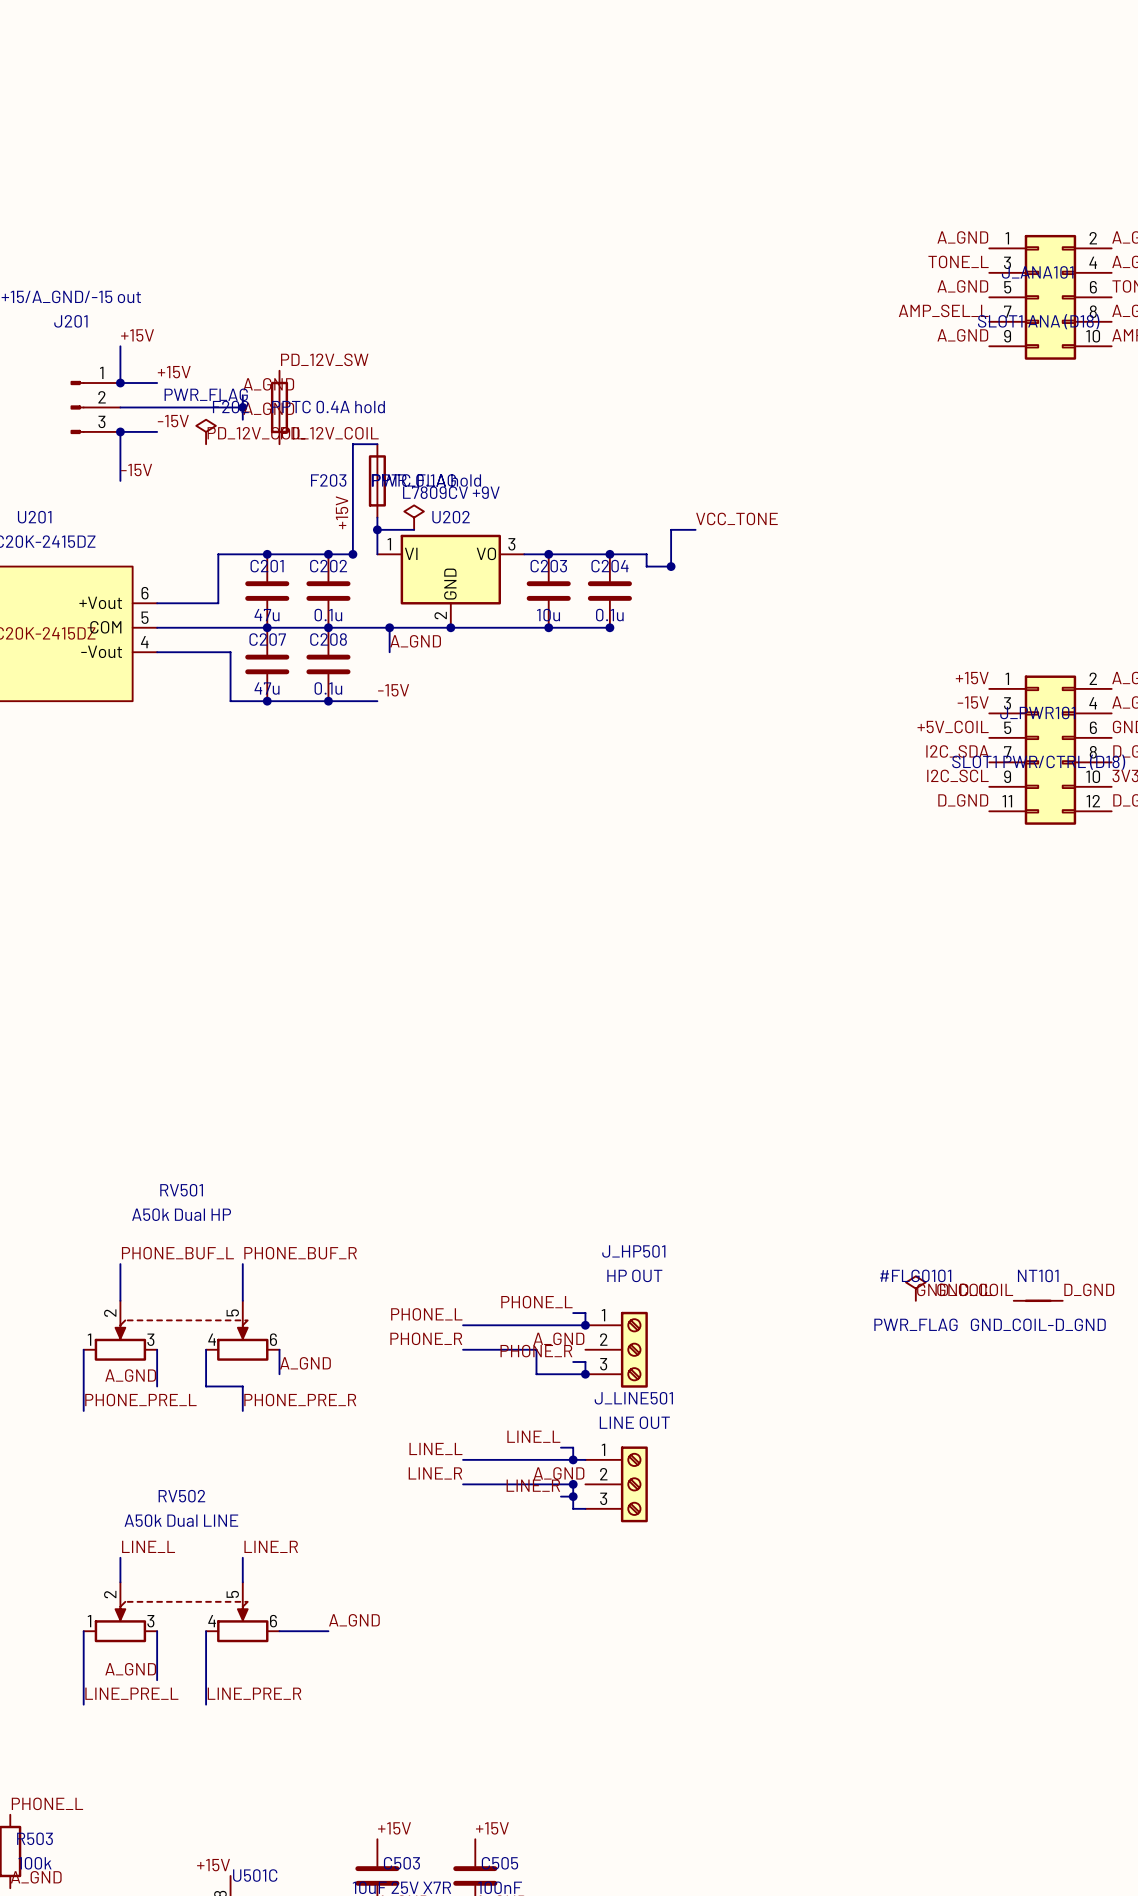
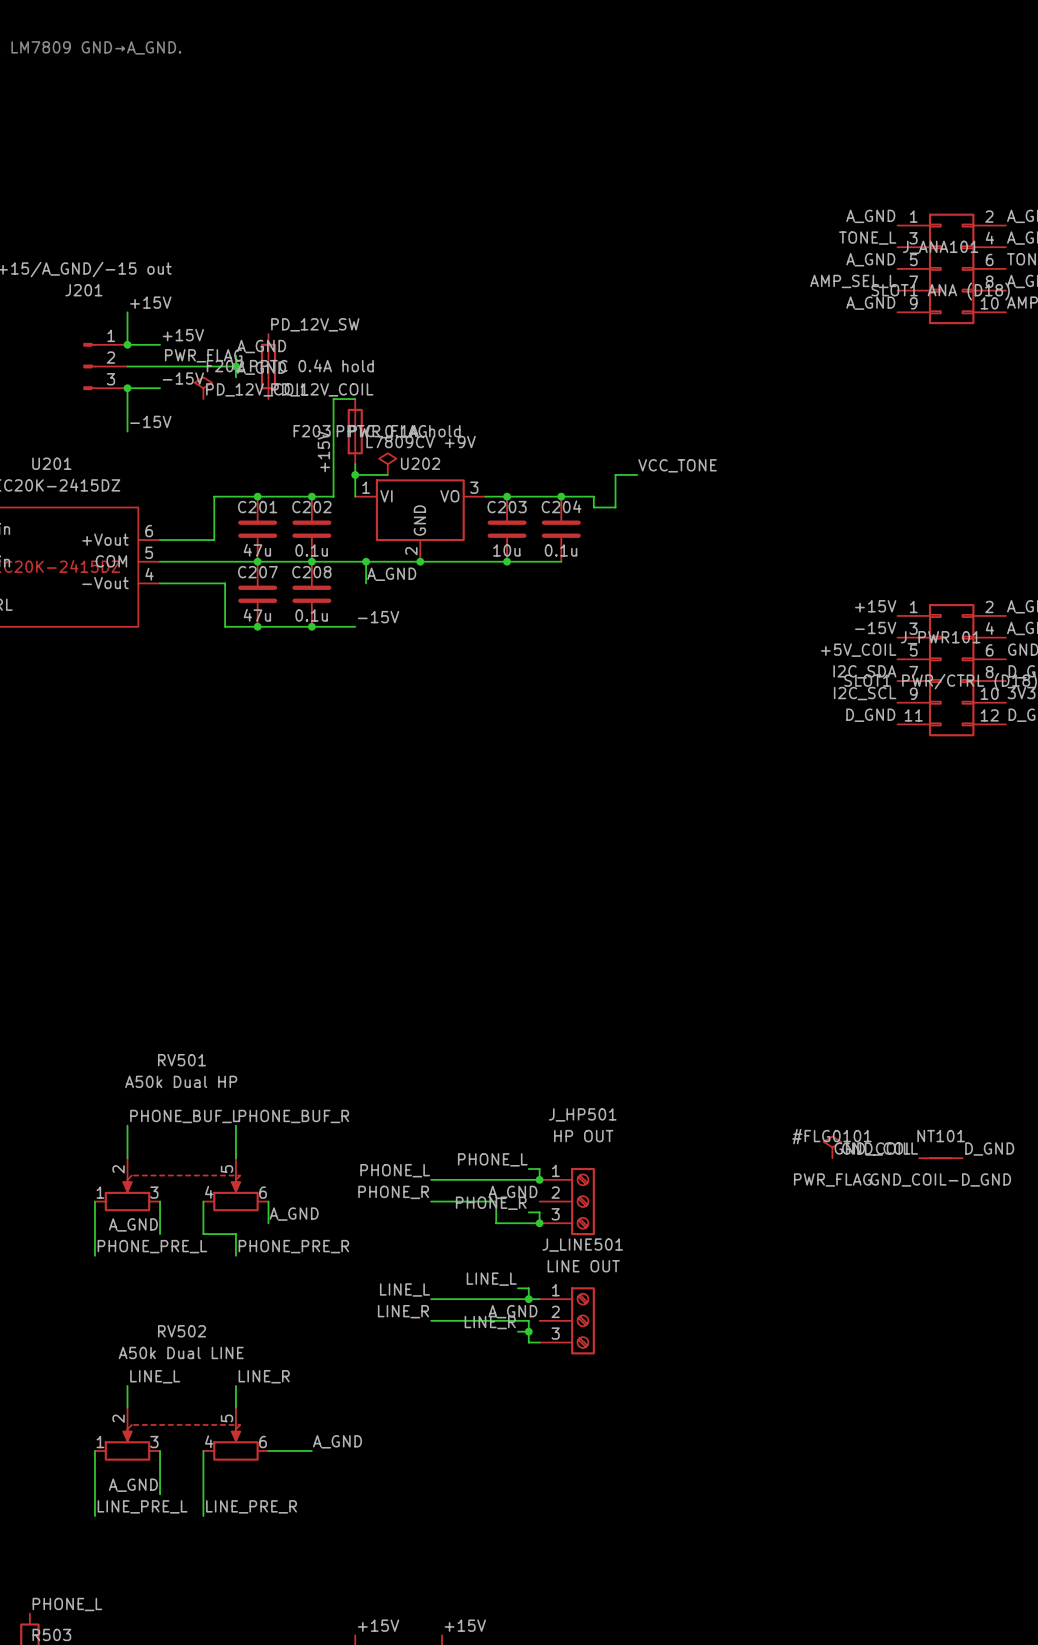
junction: (352, 554) -> none
junction: (671, 566) -> none
junction: (609, 627) -> none
junction: (573, 1484) -> none

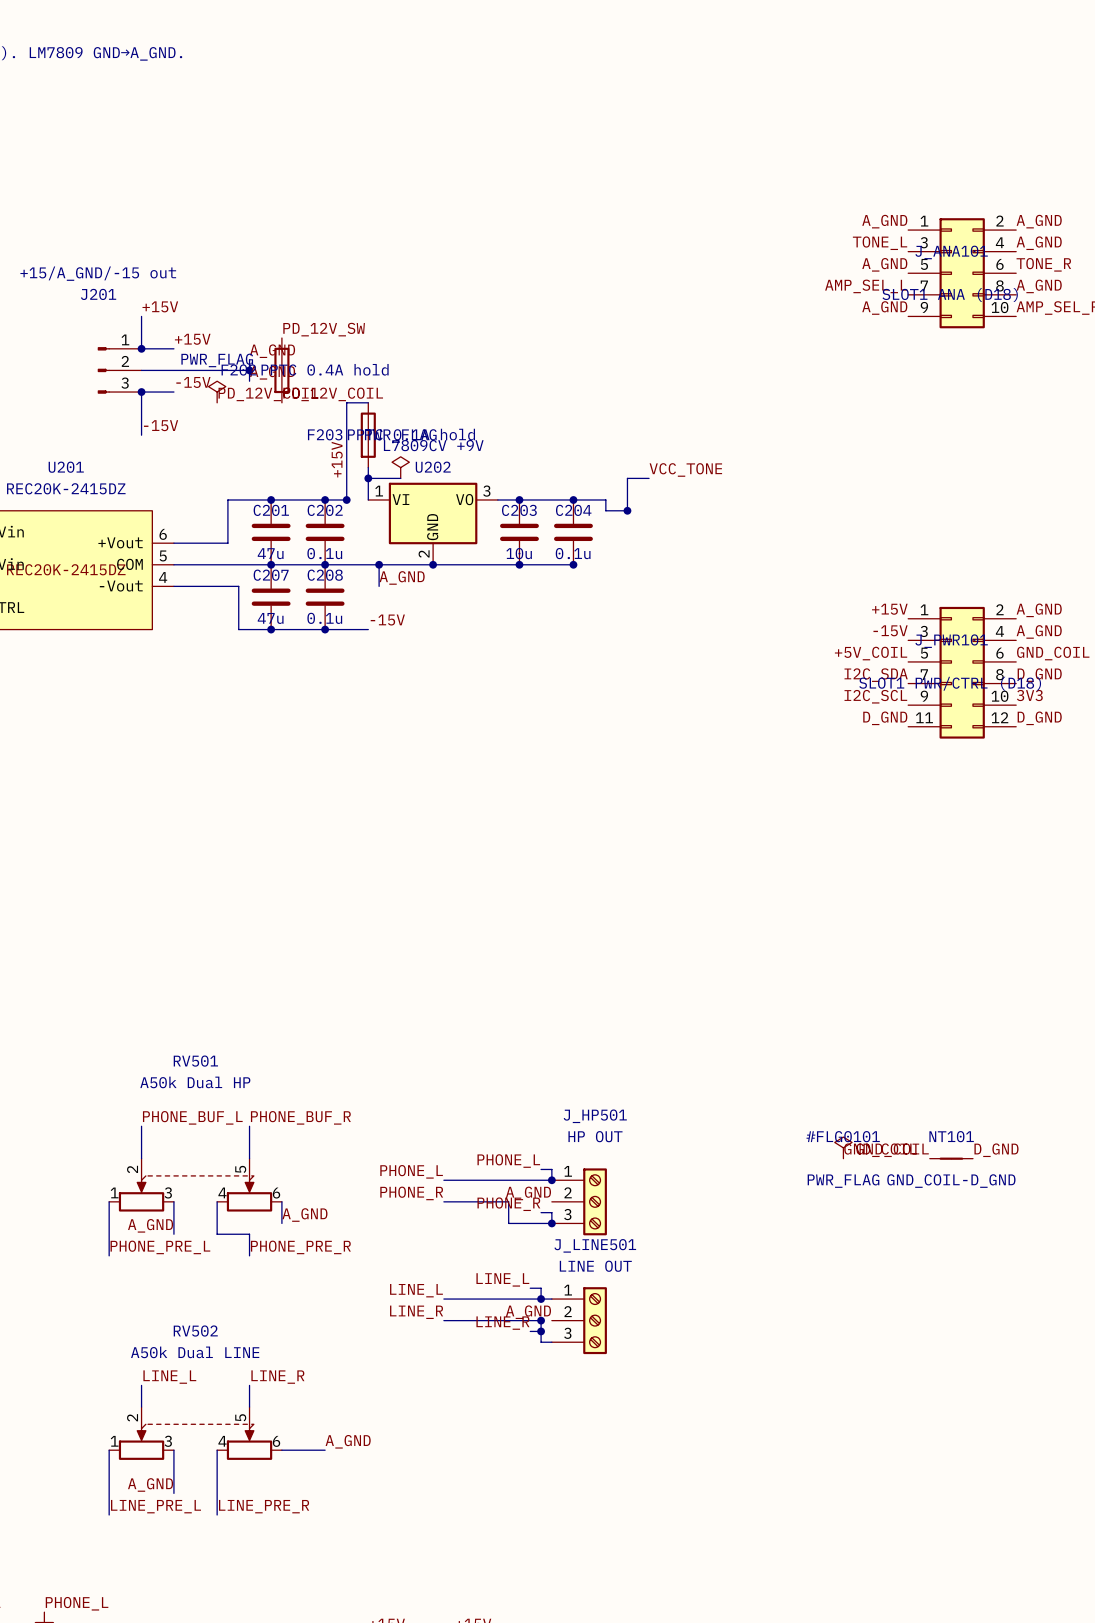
junction: none -> (346, 499)
junction: none -> (627, 510)
junction: none -> (573, 564)
junction: none -> (541, 1320)

